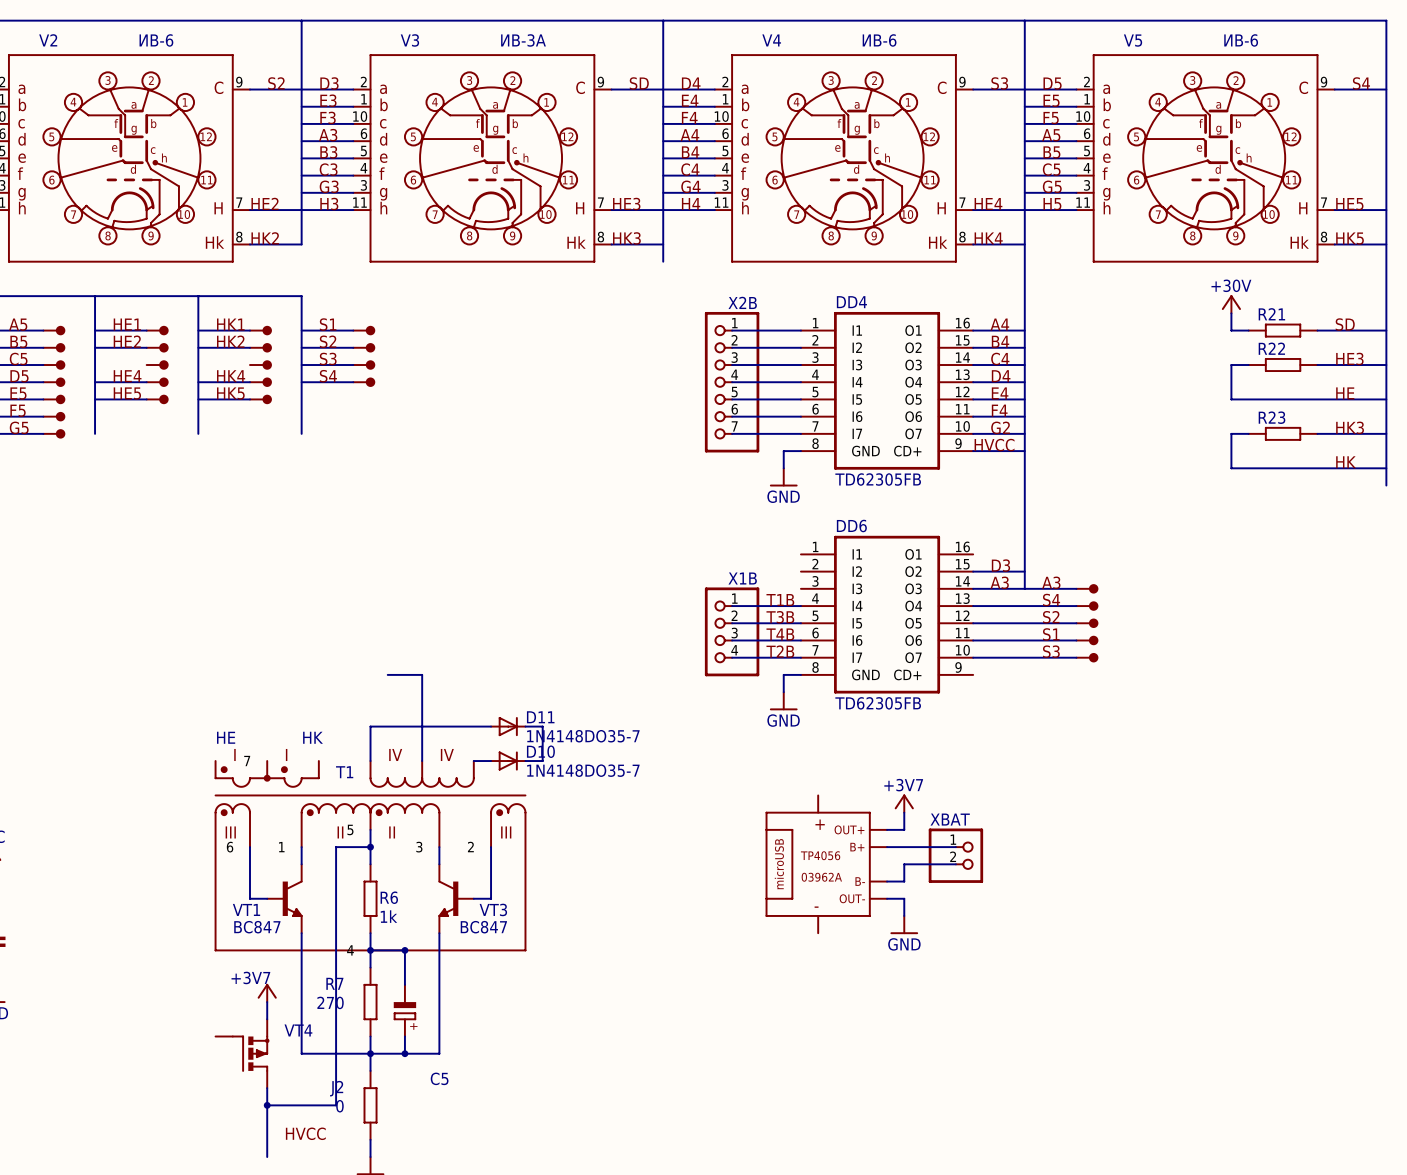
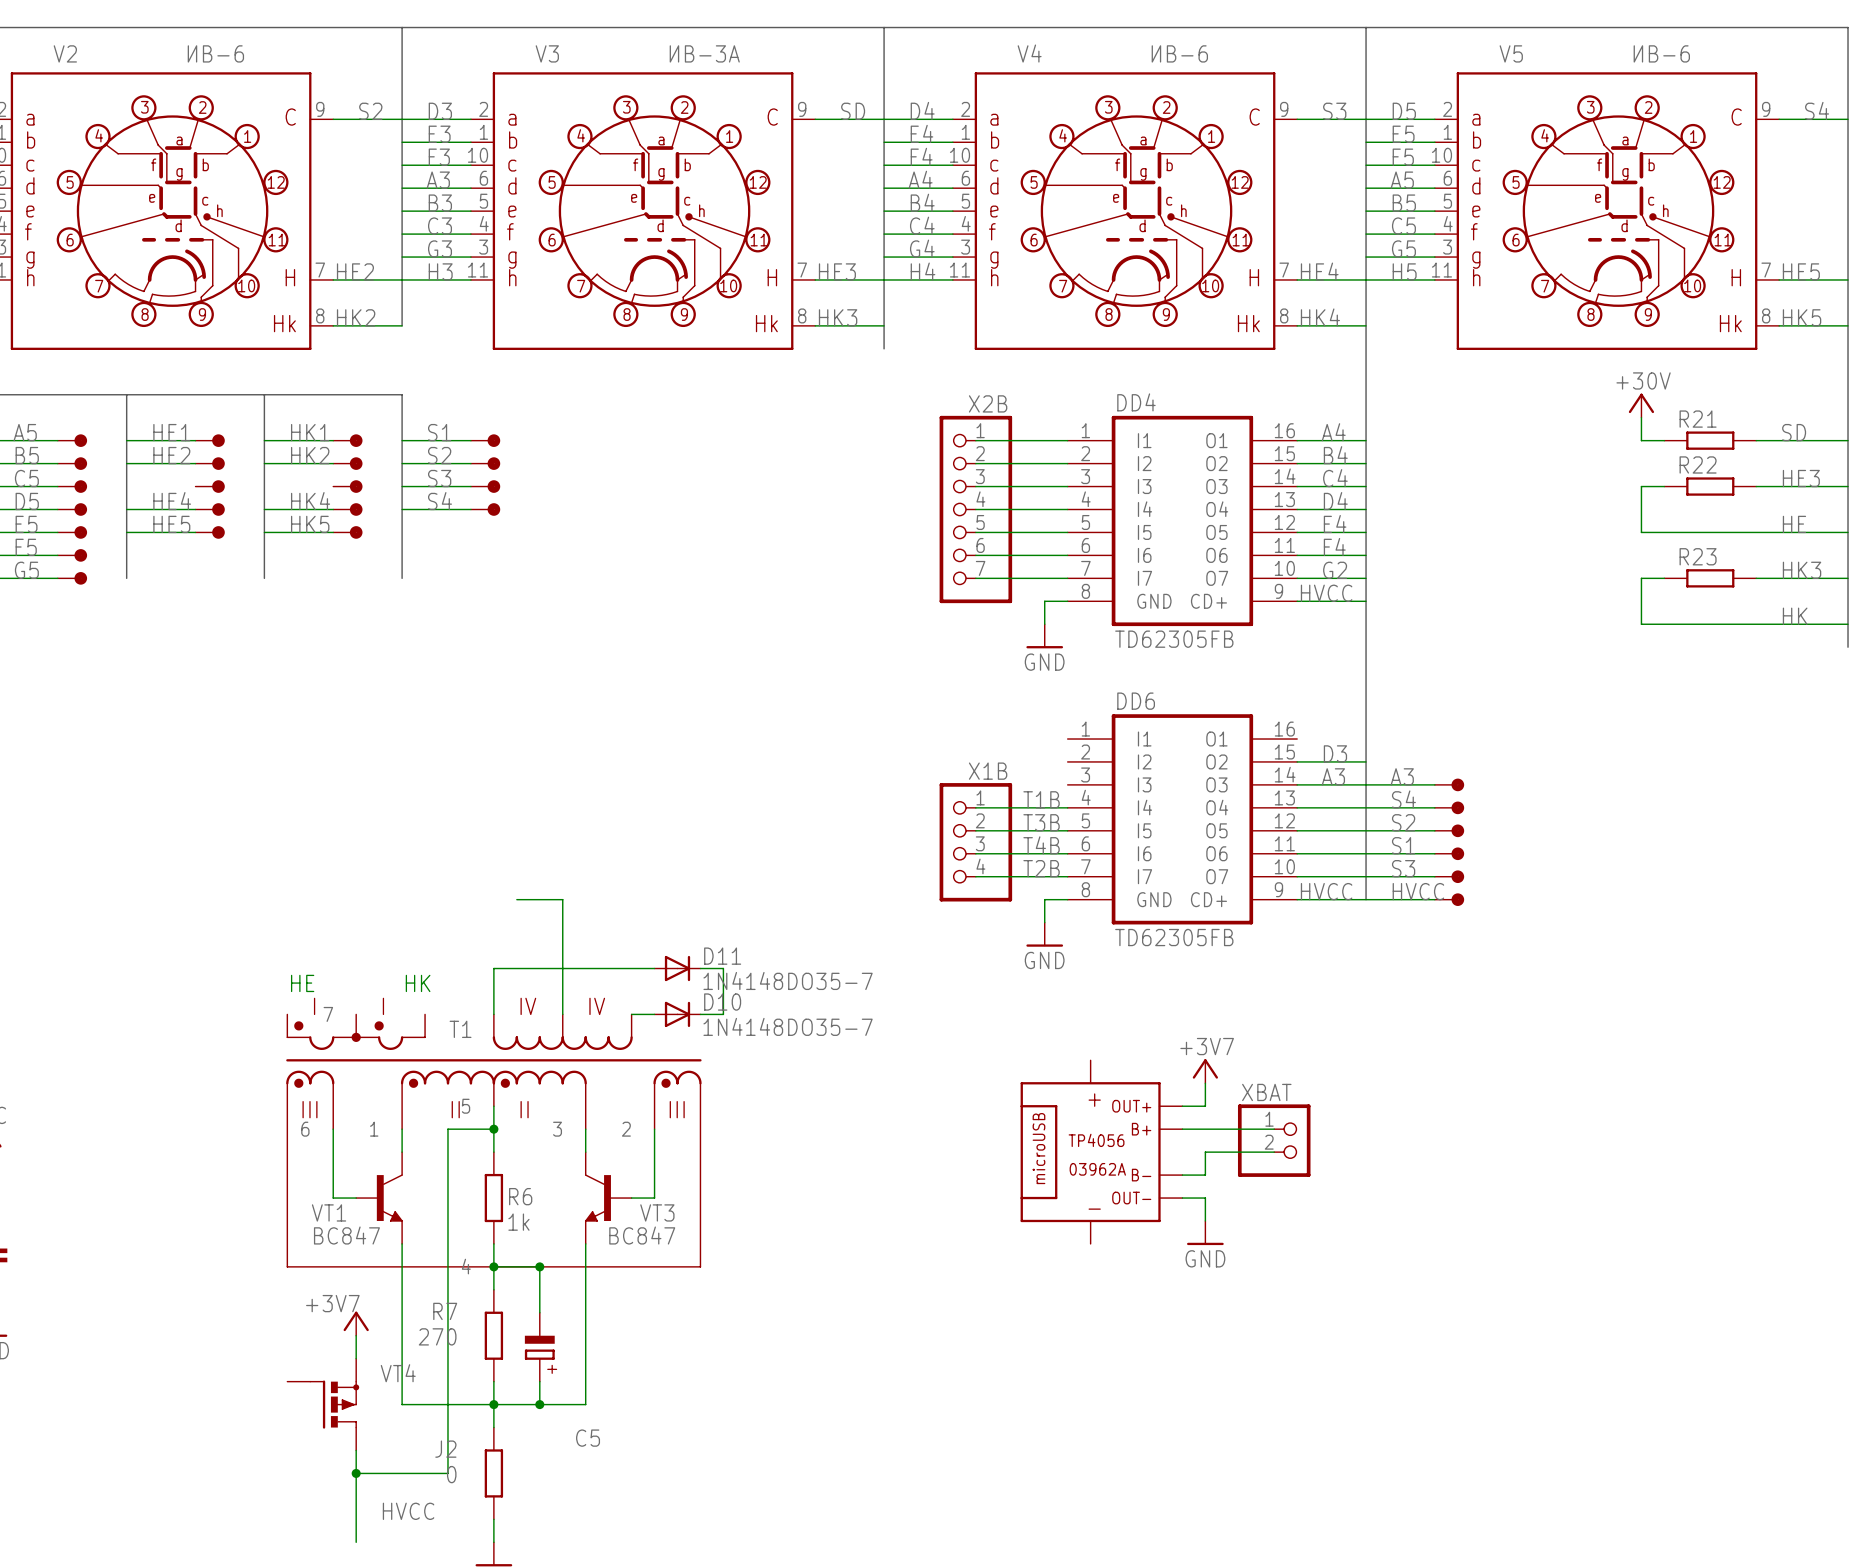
bus: none -> (1366, 784) (1366, 899)
label: none -> HVCC (1326, 891)
label: none -> HVCC (1418, 891)
wire: none -> (1297, 899) (1434, 899)
part: none -> (1449, 899)

